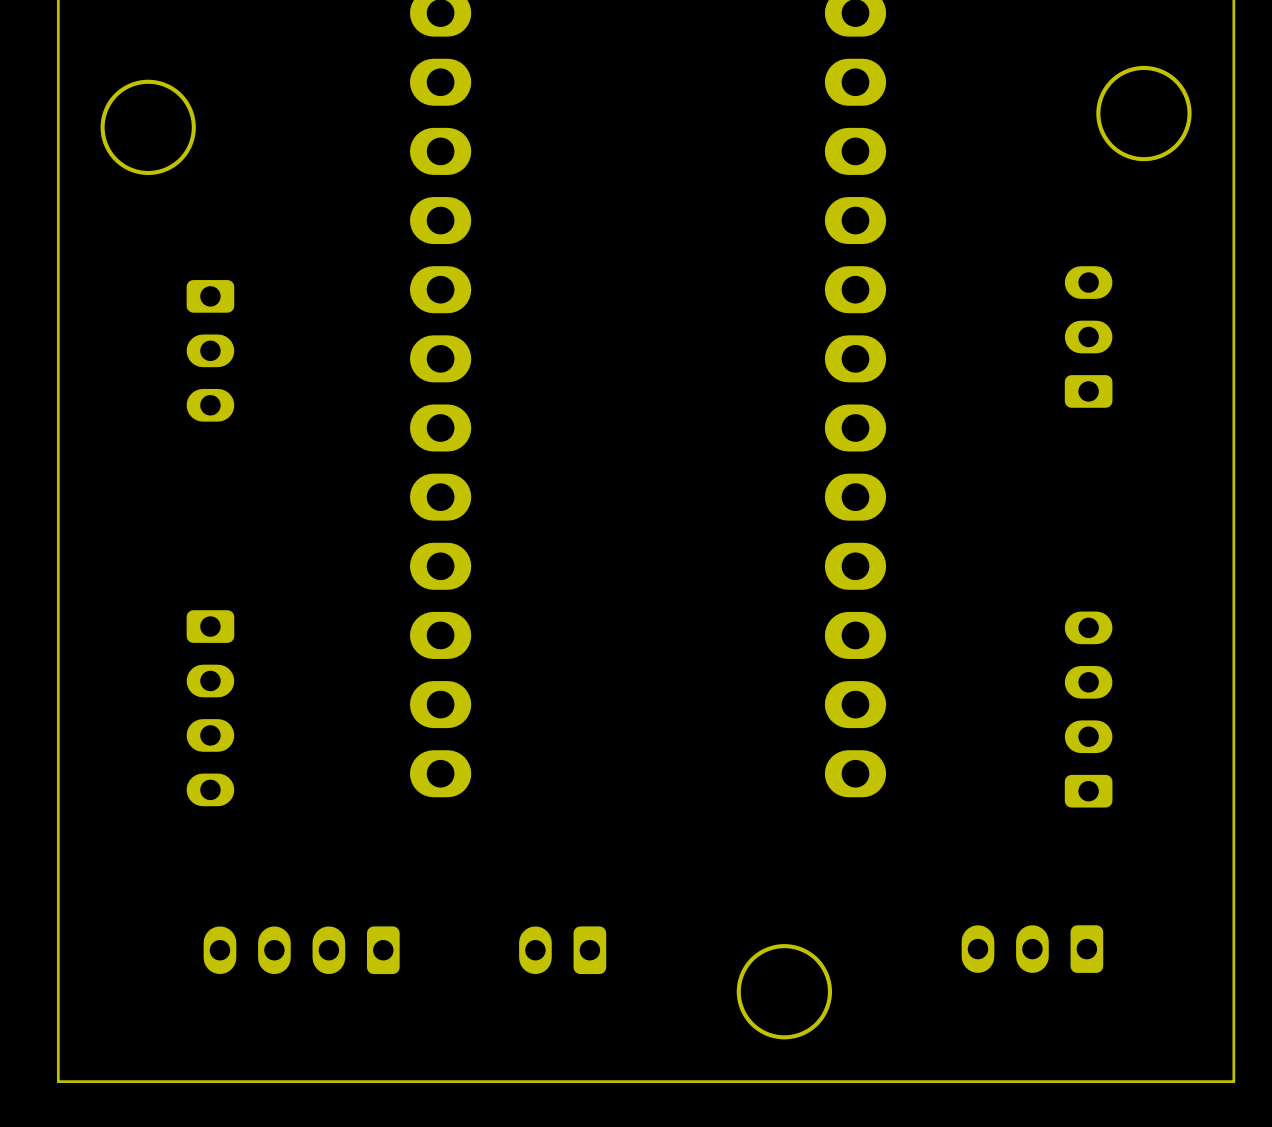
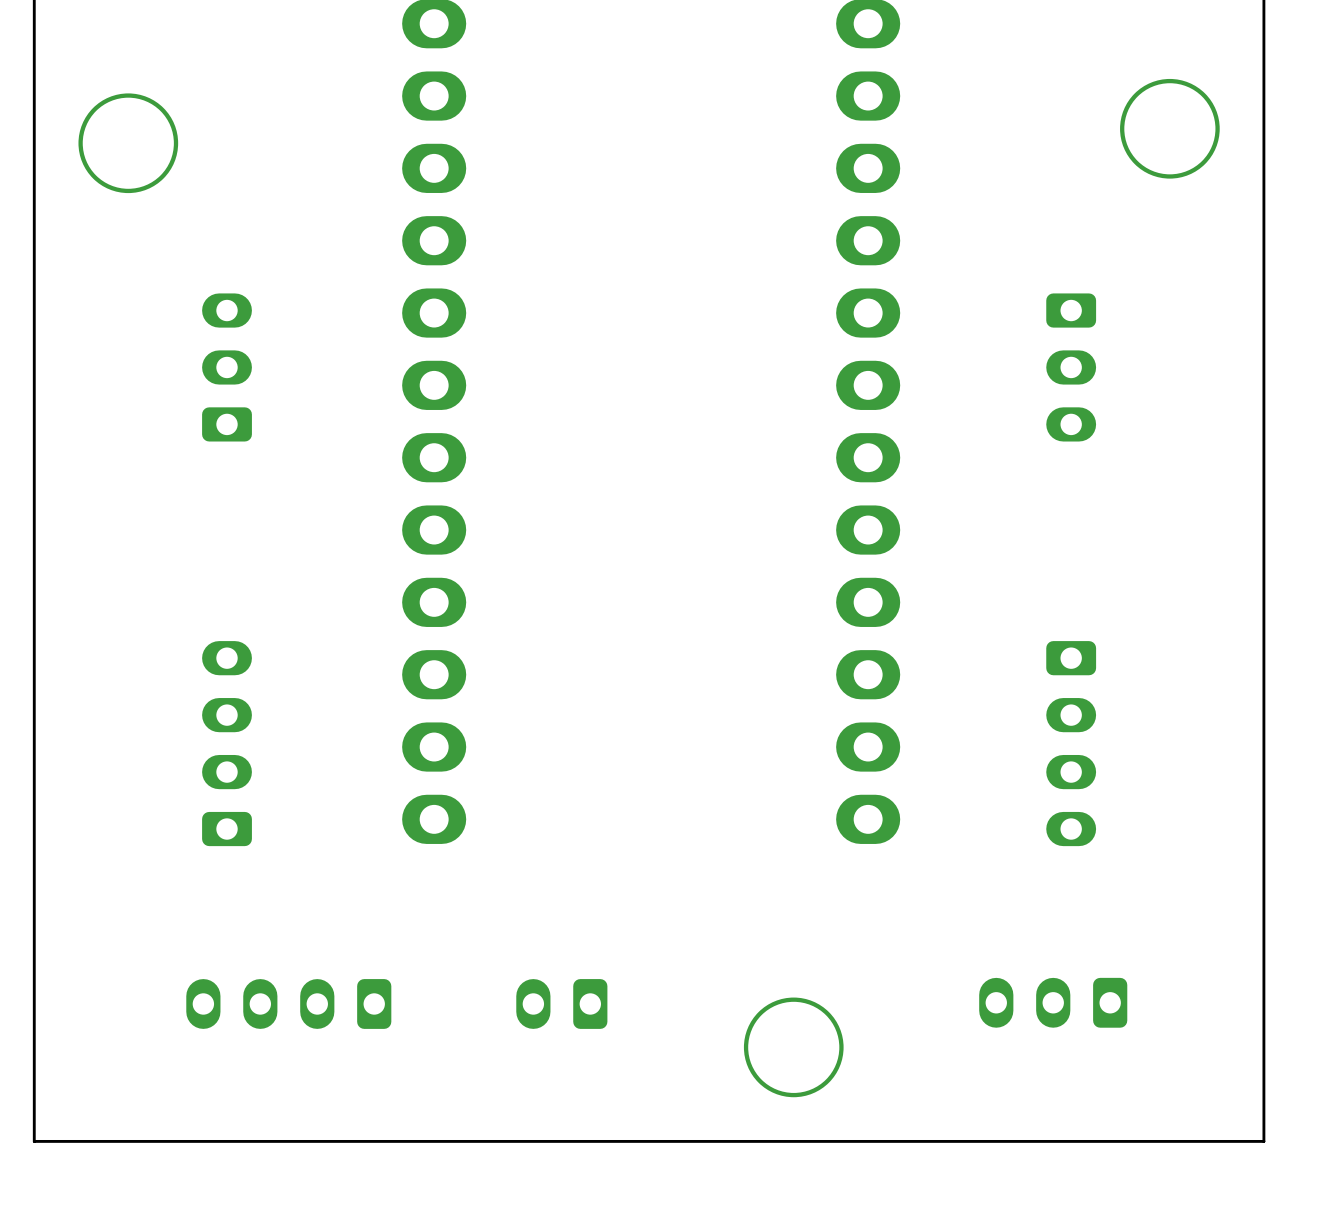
part rotation: 0° (1088, 337) -> 180° (1071, 367)
part rotation: 0° (210, 350) -> 180° (227, 367)
part rotation: 0° (210, 708) -> 180° (227, 743)
part rotation: 0° (1088, 709) -> 180° (1071, 743)

